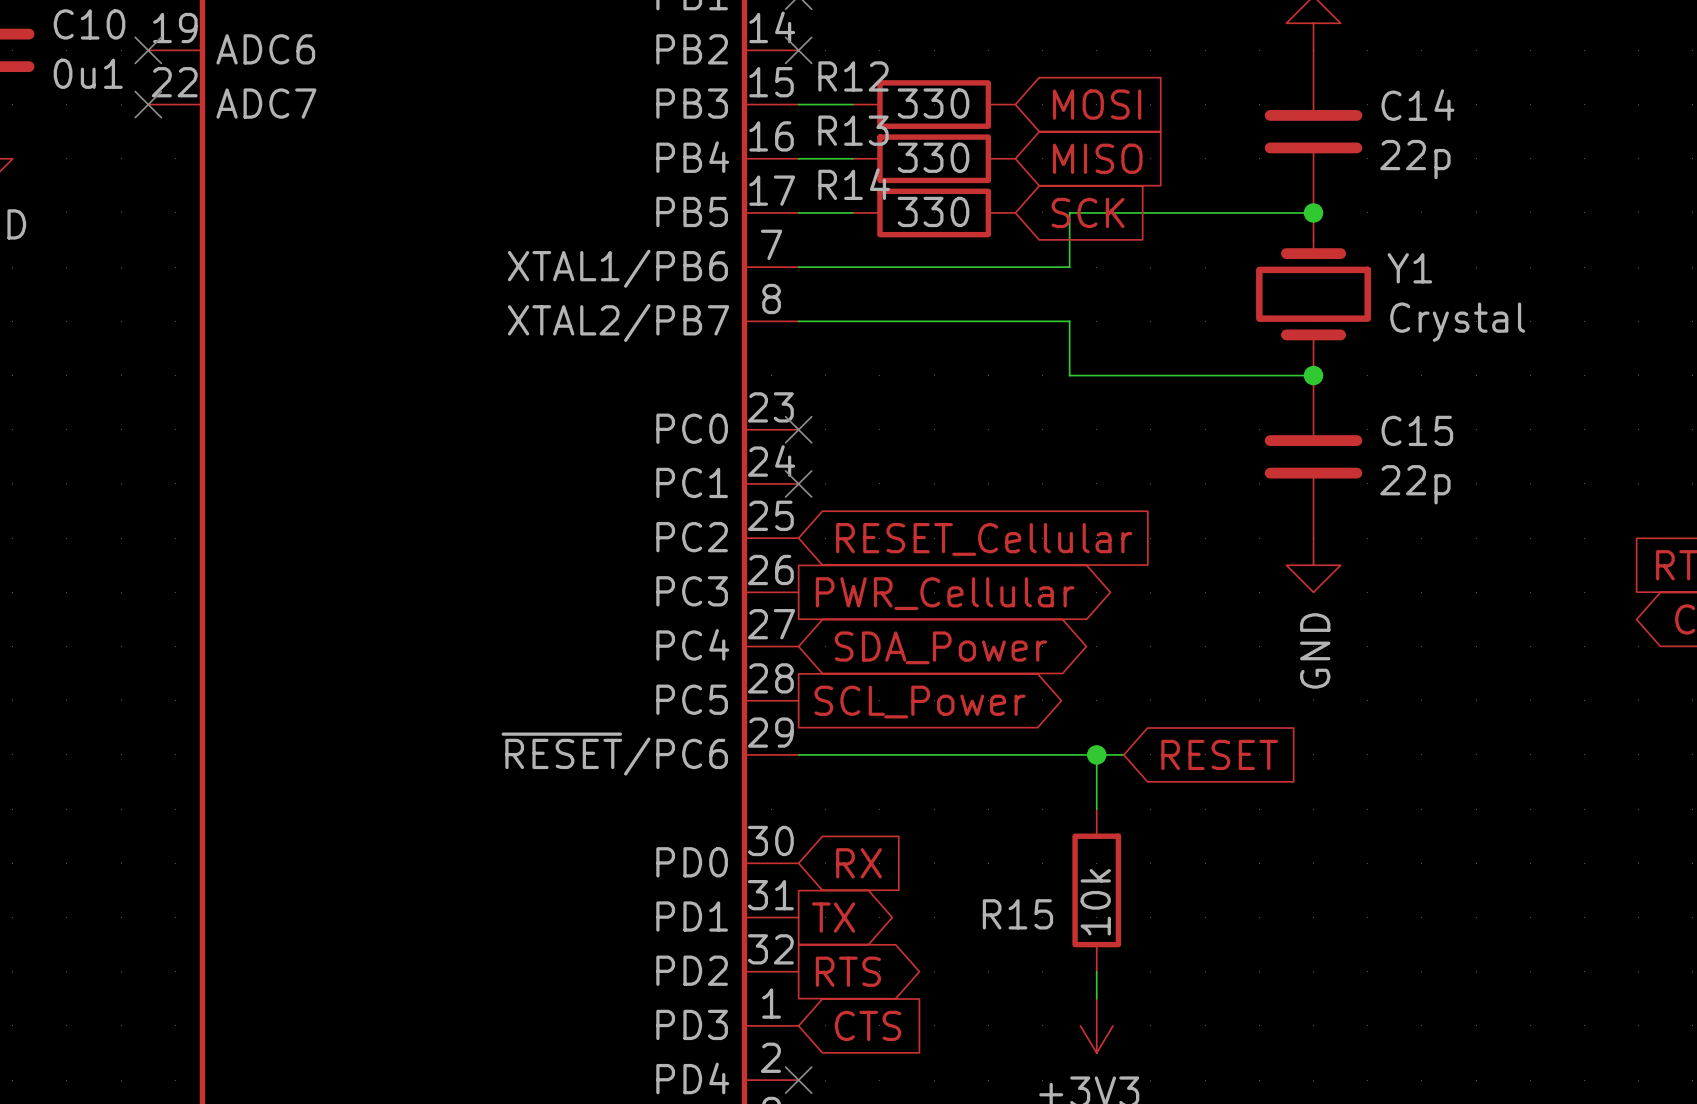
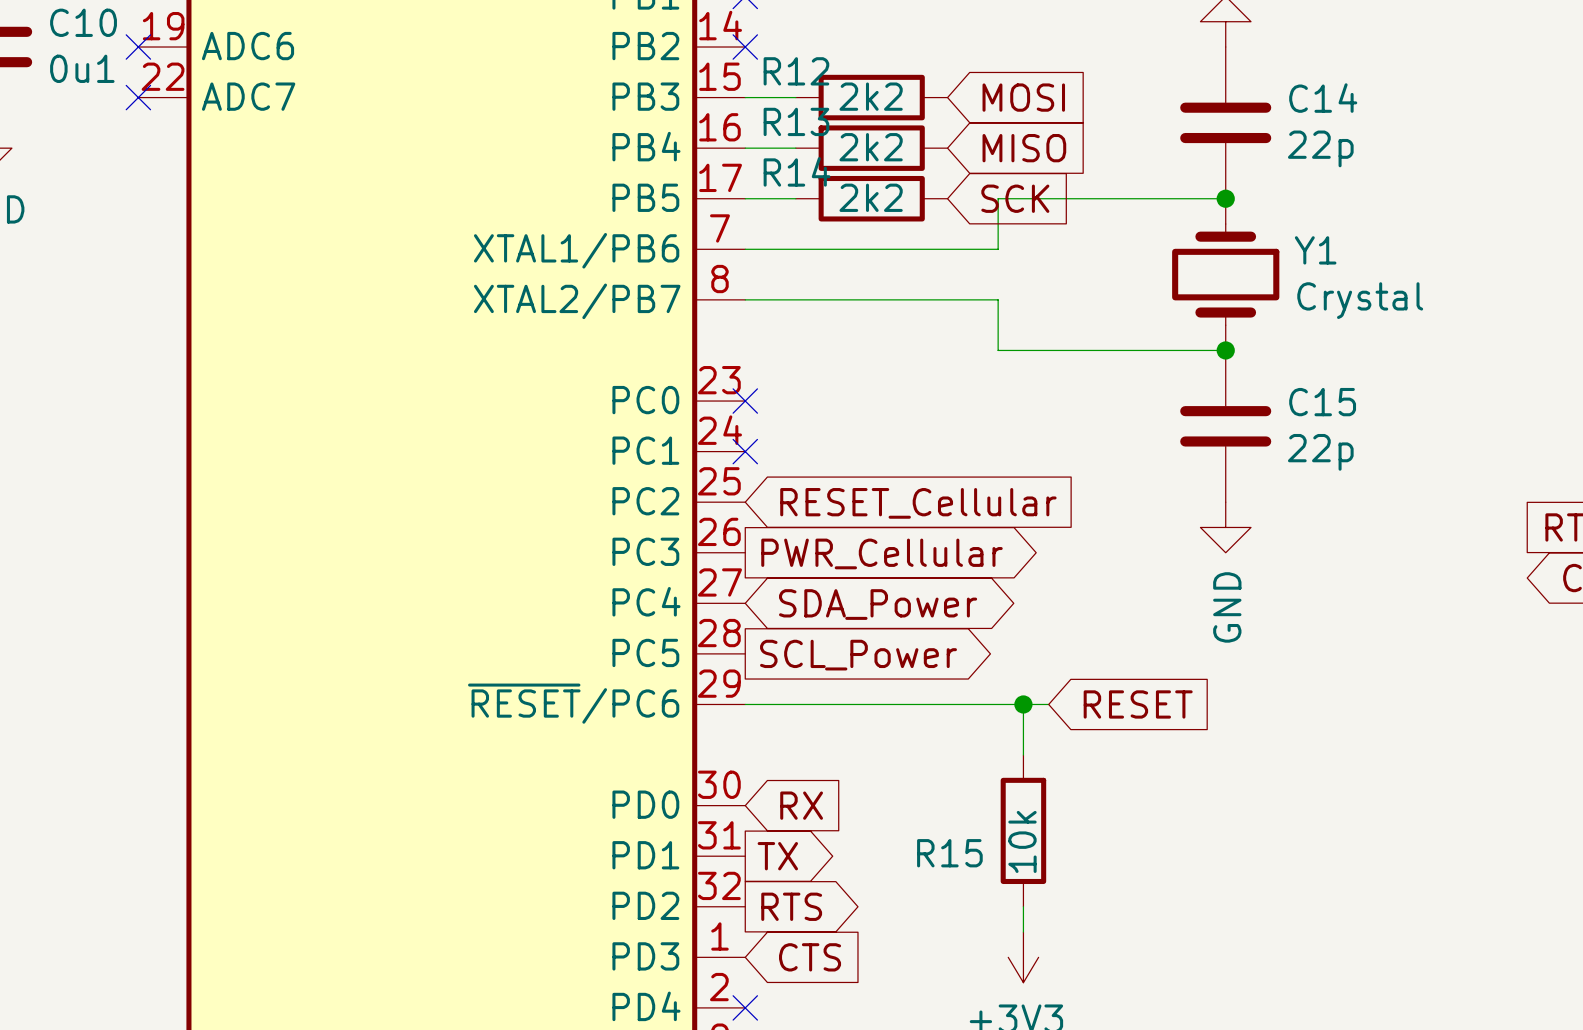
R12 value: 330 (933, 103) -> 2k2 (871, 96)
R13 value: 330 (933, 157) -> 2k2 (871, 147)
R14 value: 330 (933, 211) -> 2k2 (871, 197)

